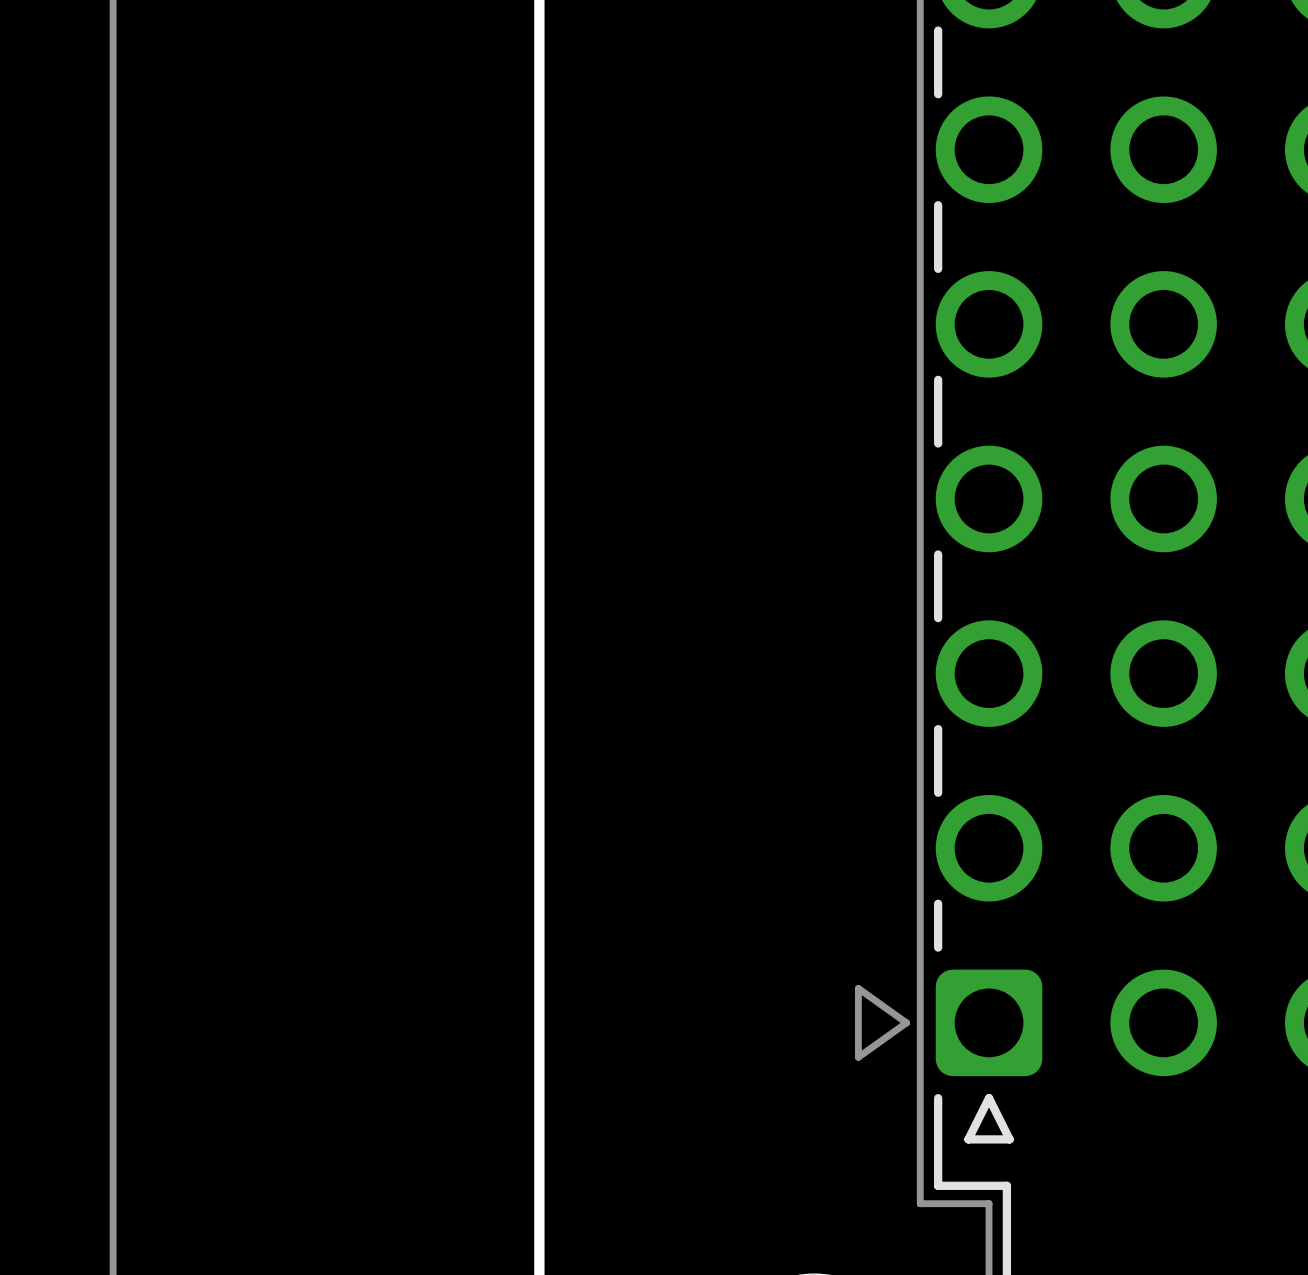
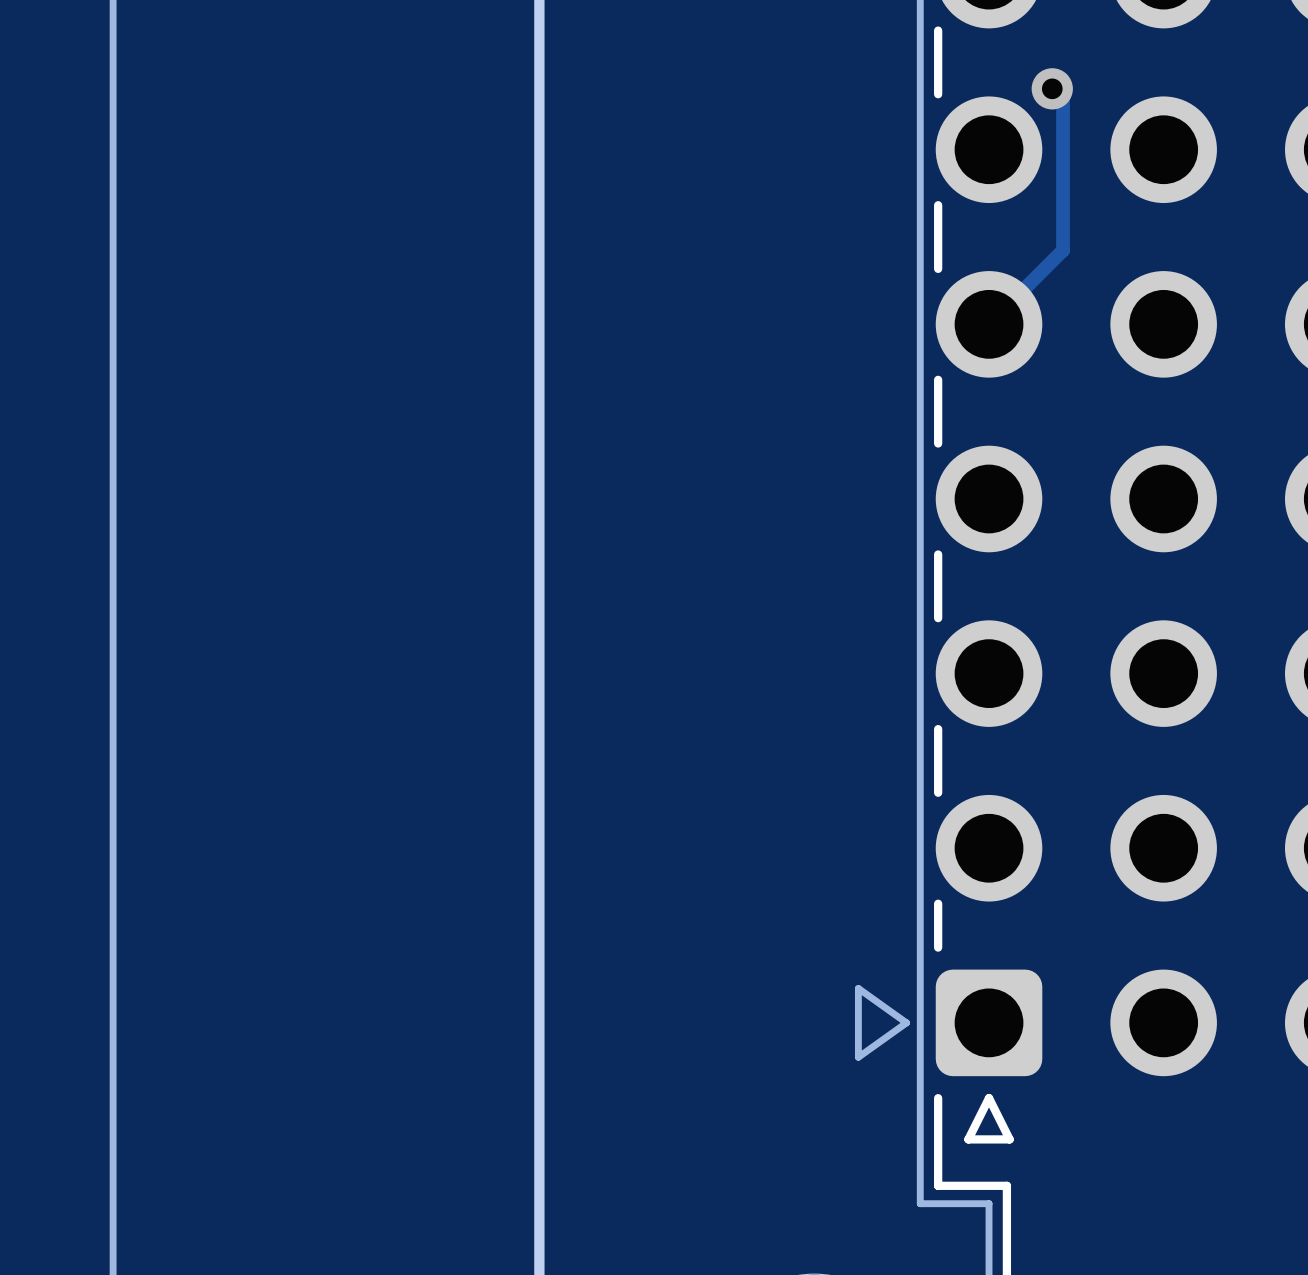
track: none -> (1052, 88) (1063, 99) (1063, 250) (989, 324)
via: none -> (1052, 88)

